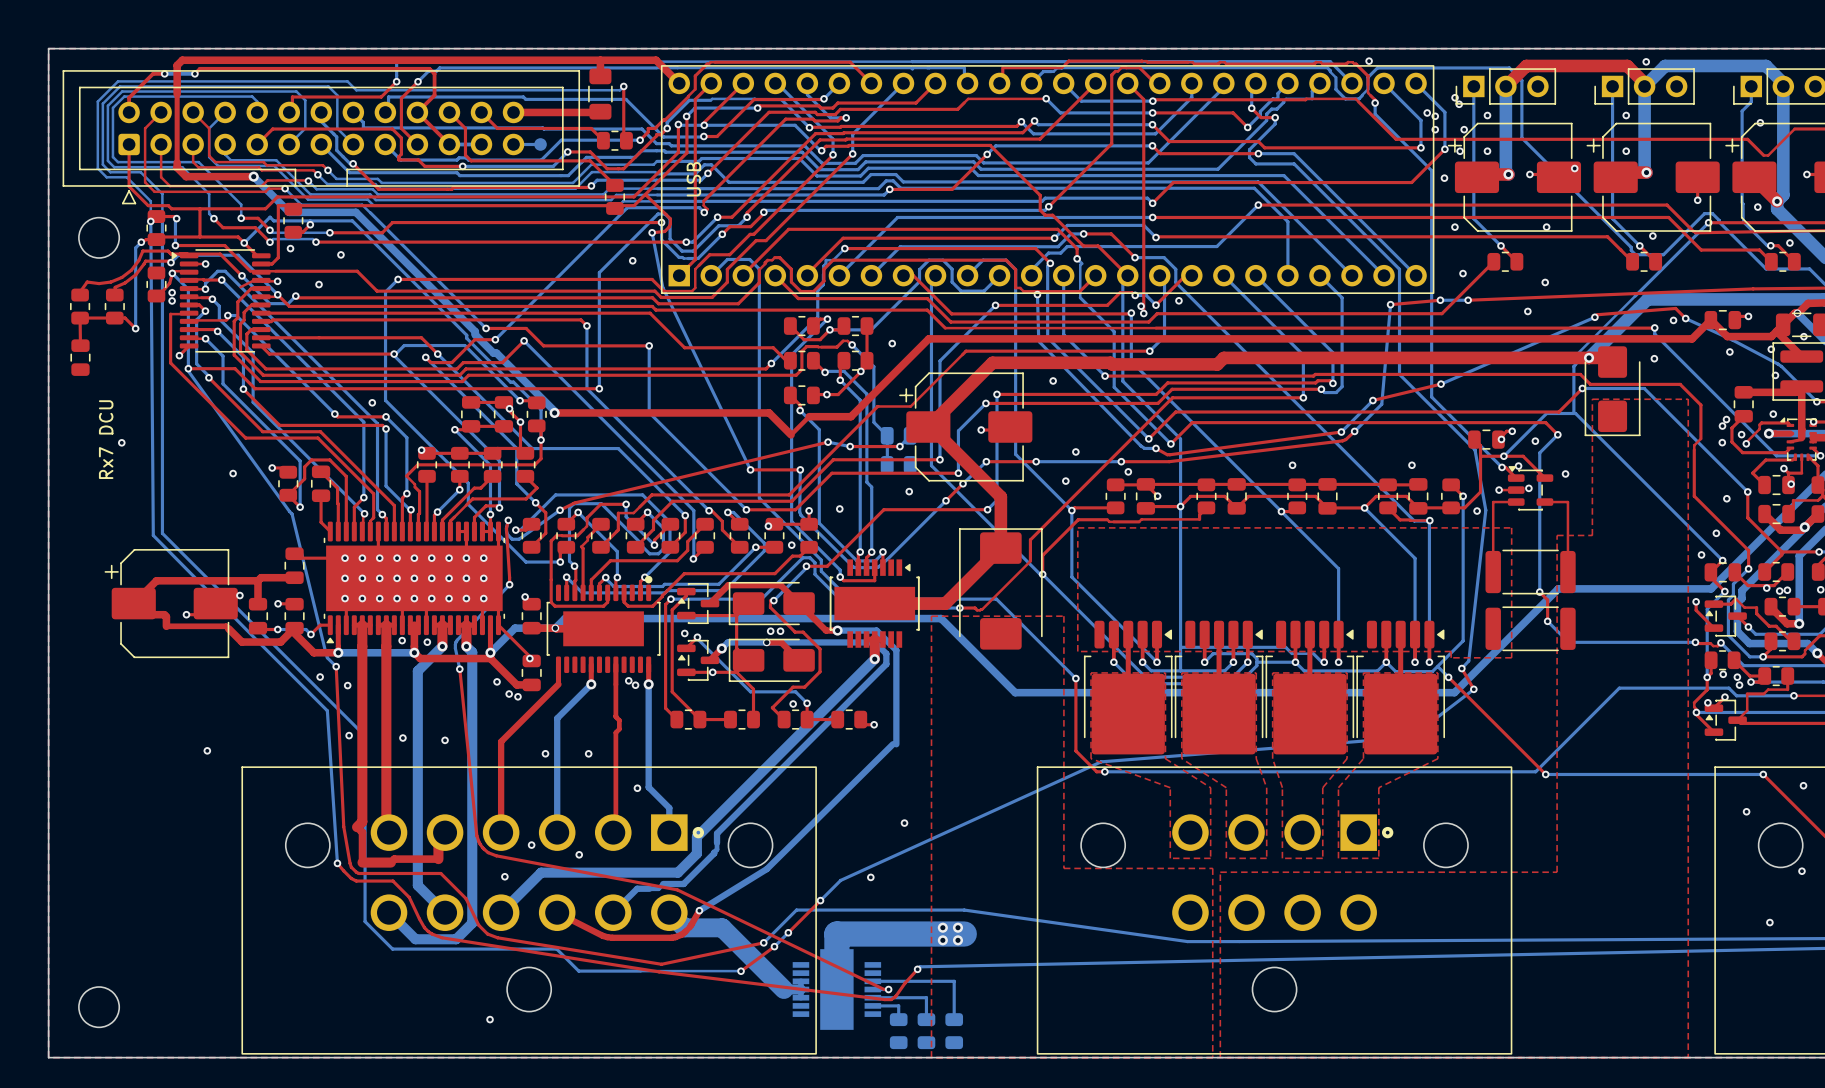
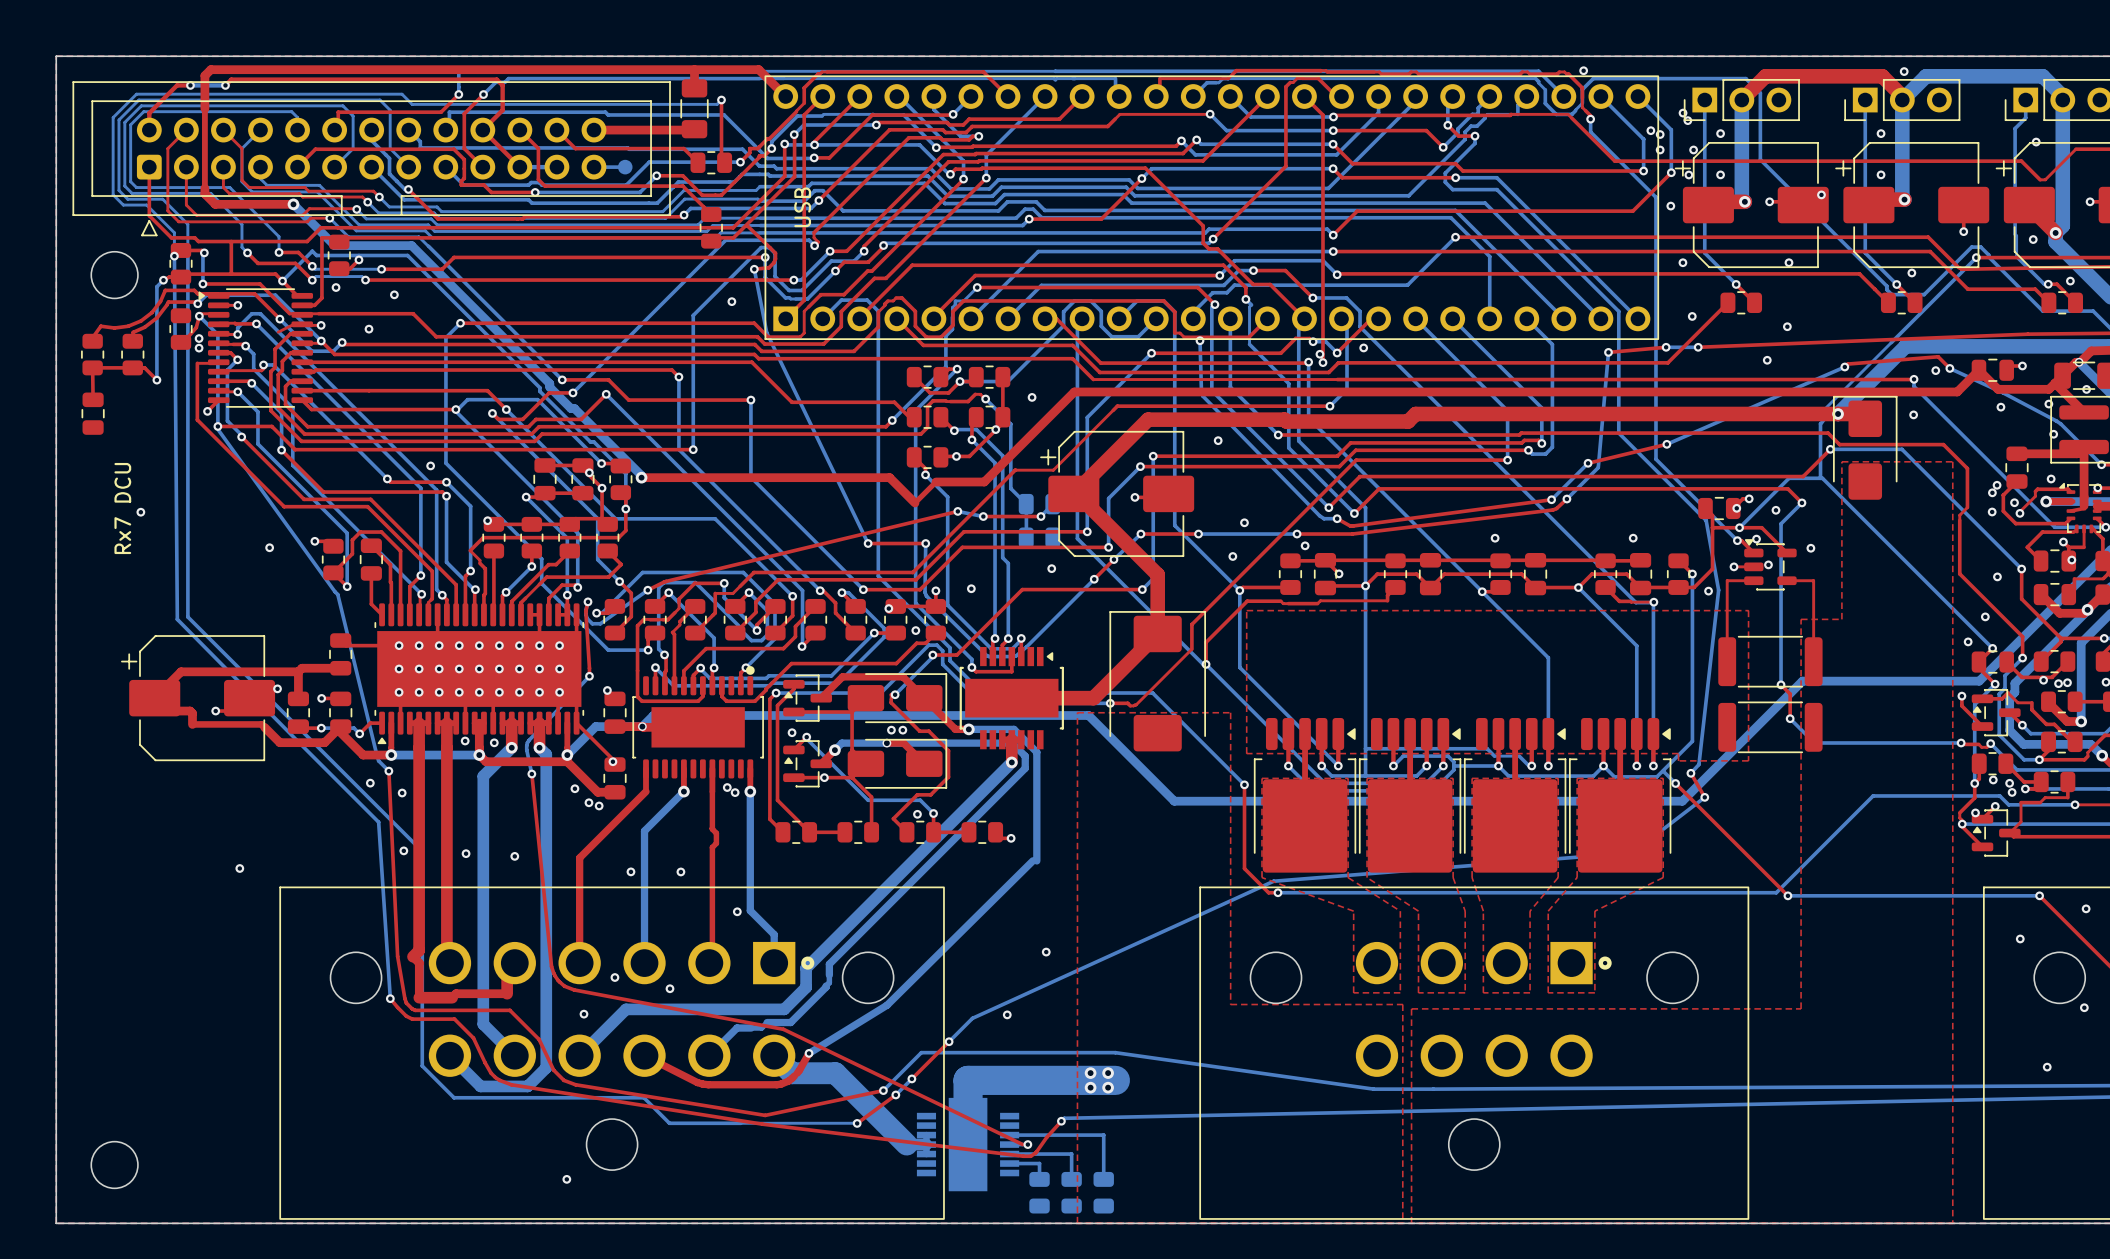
part rotation: 0° (1612, 391) -> 180° (1865, 447)
part rotation: 0° (771, 603) -> 180° (897, 698)
part rotation: 0° (771, 660) -> 180° (897, 763)

